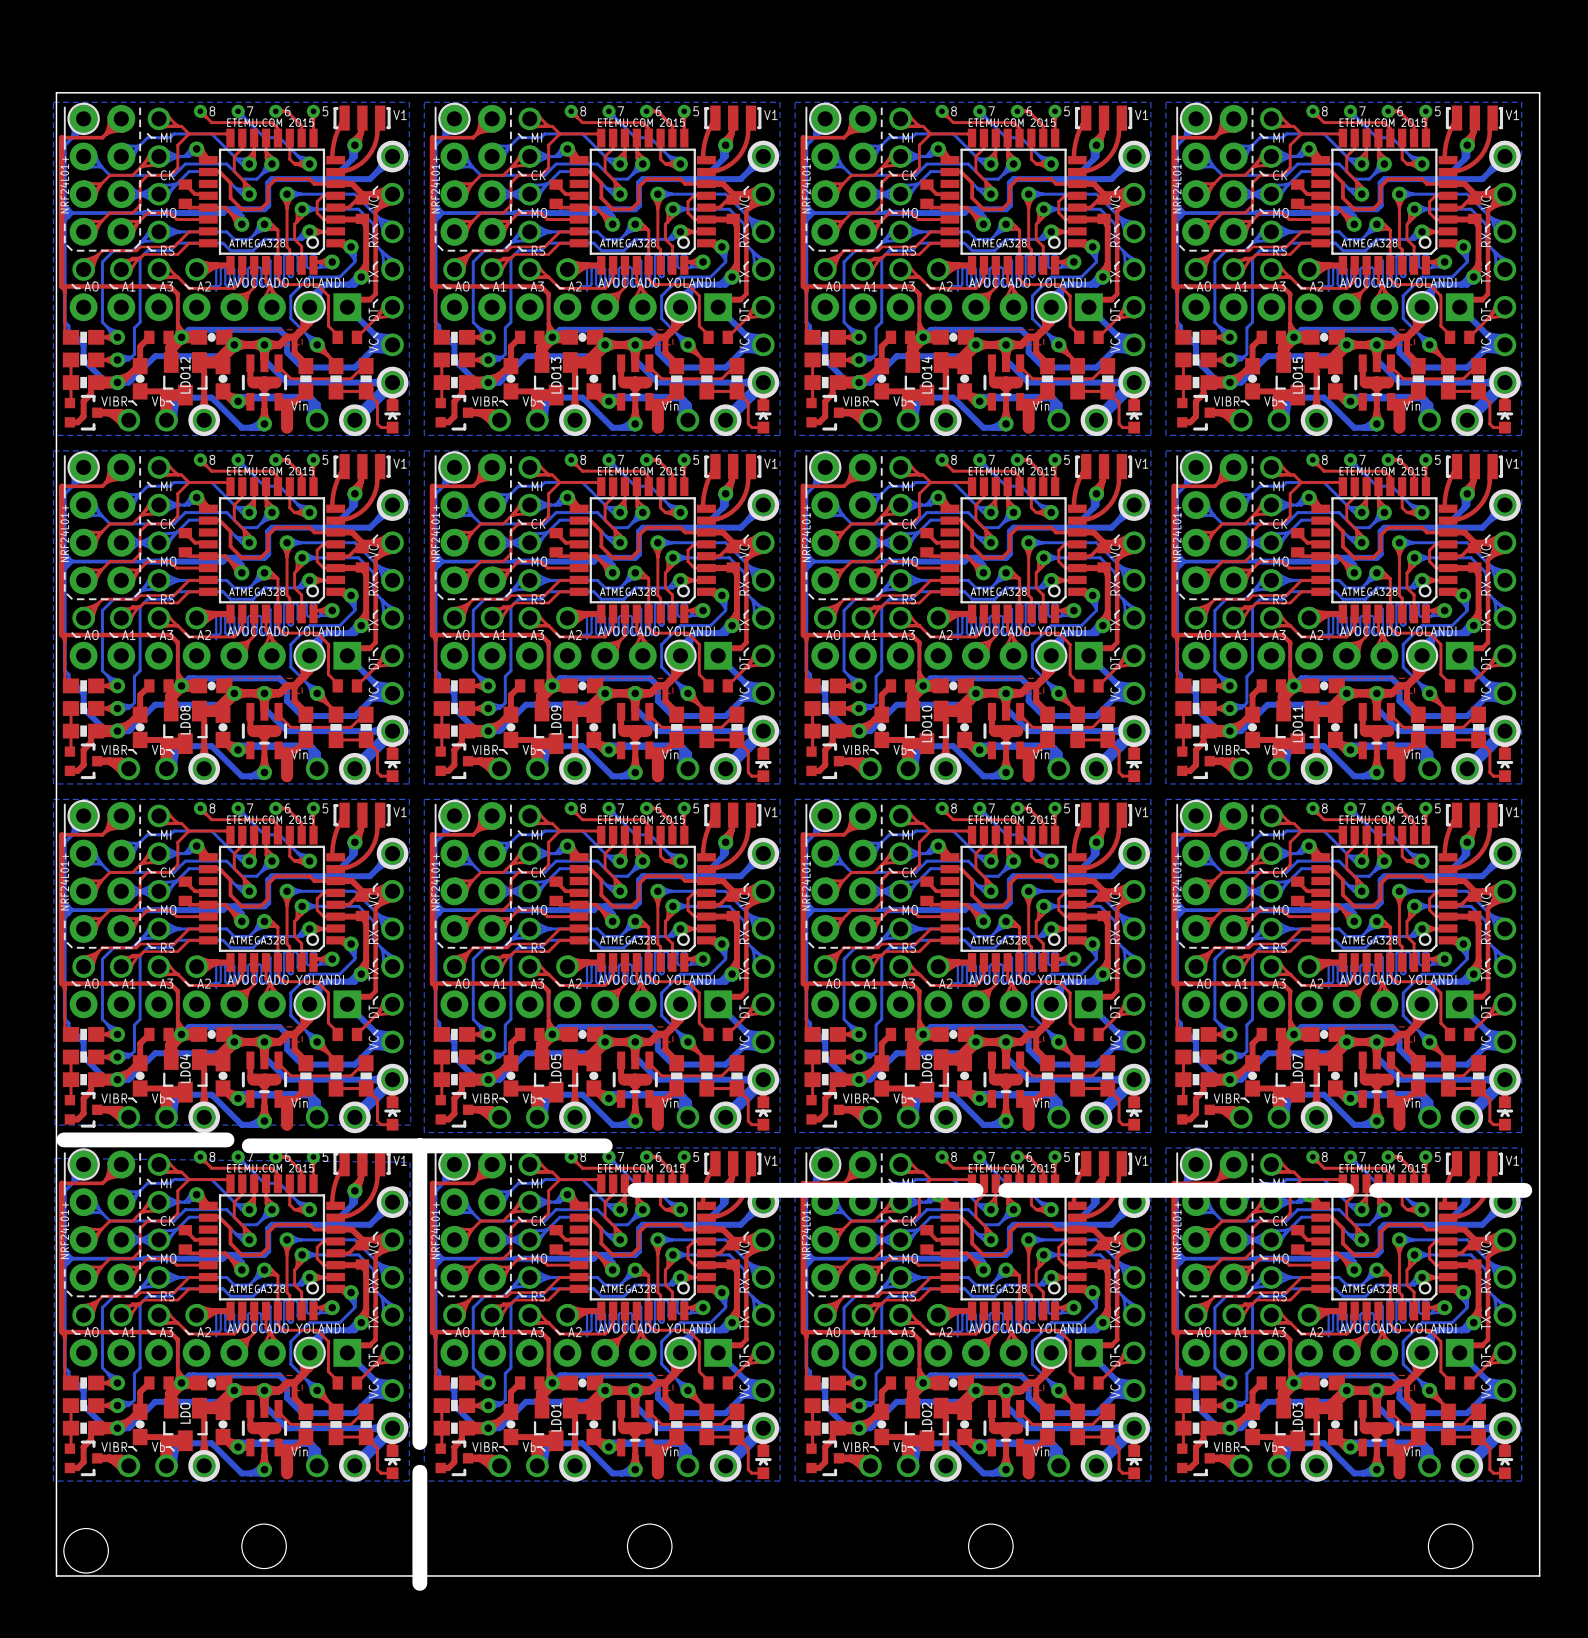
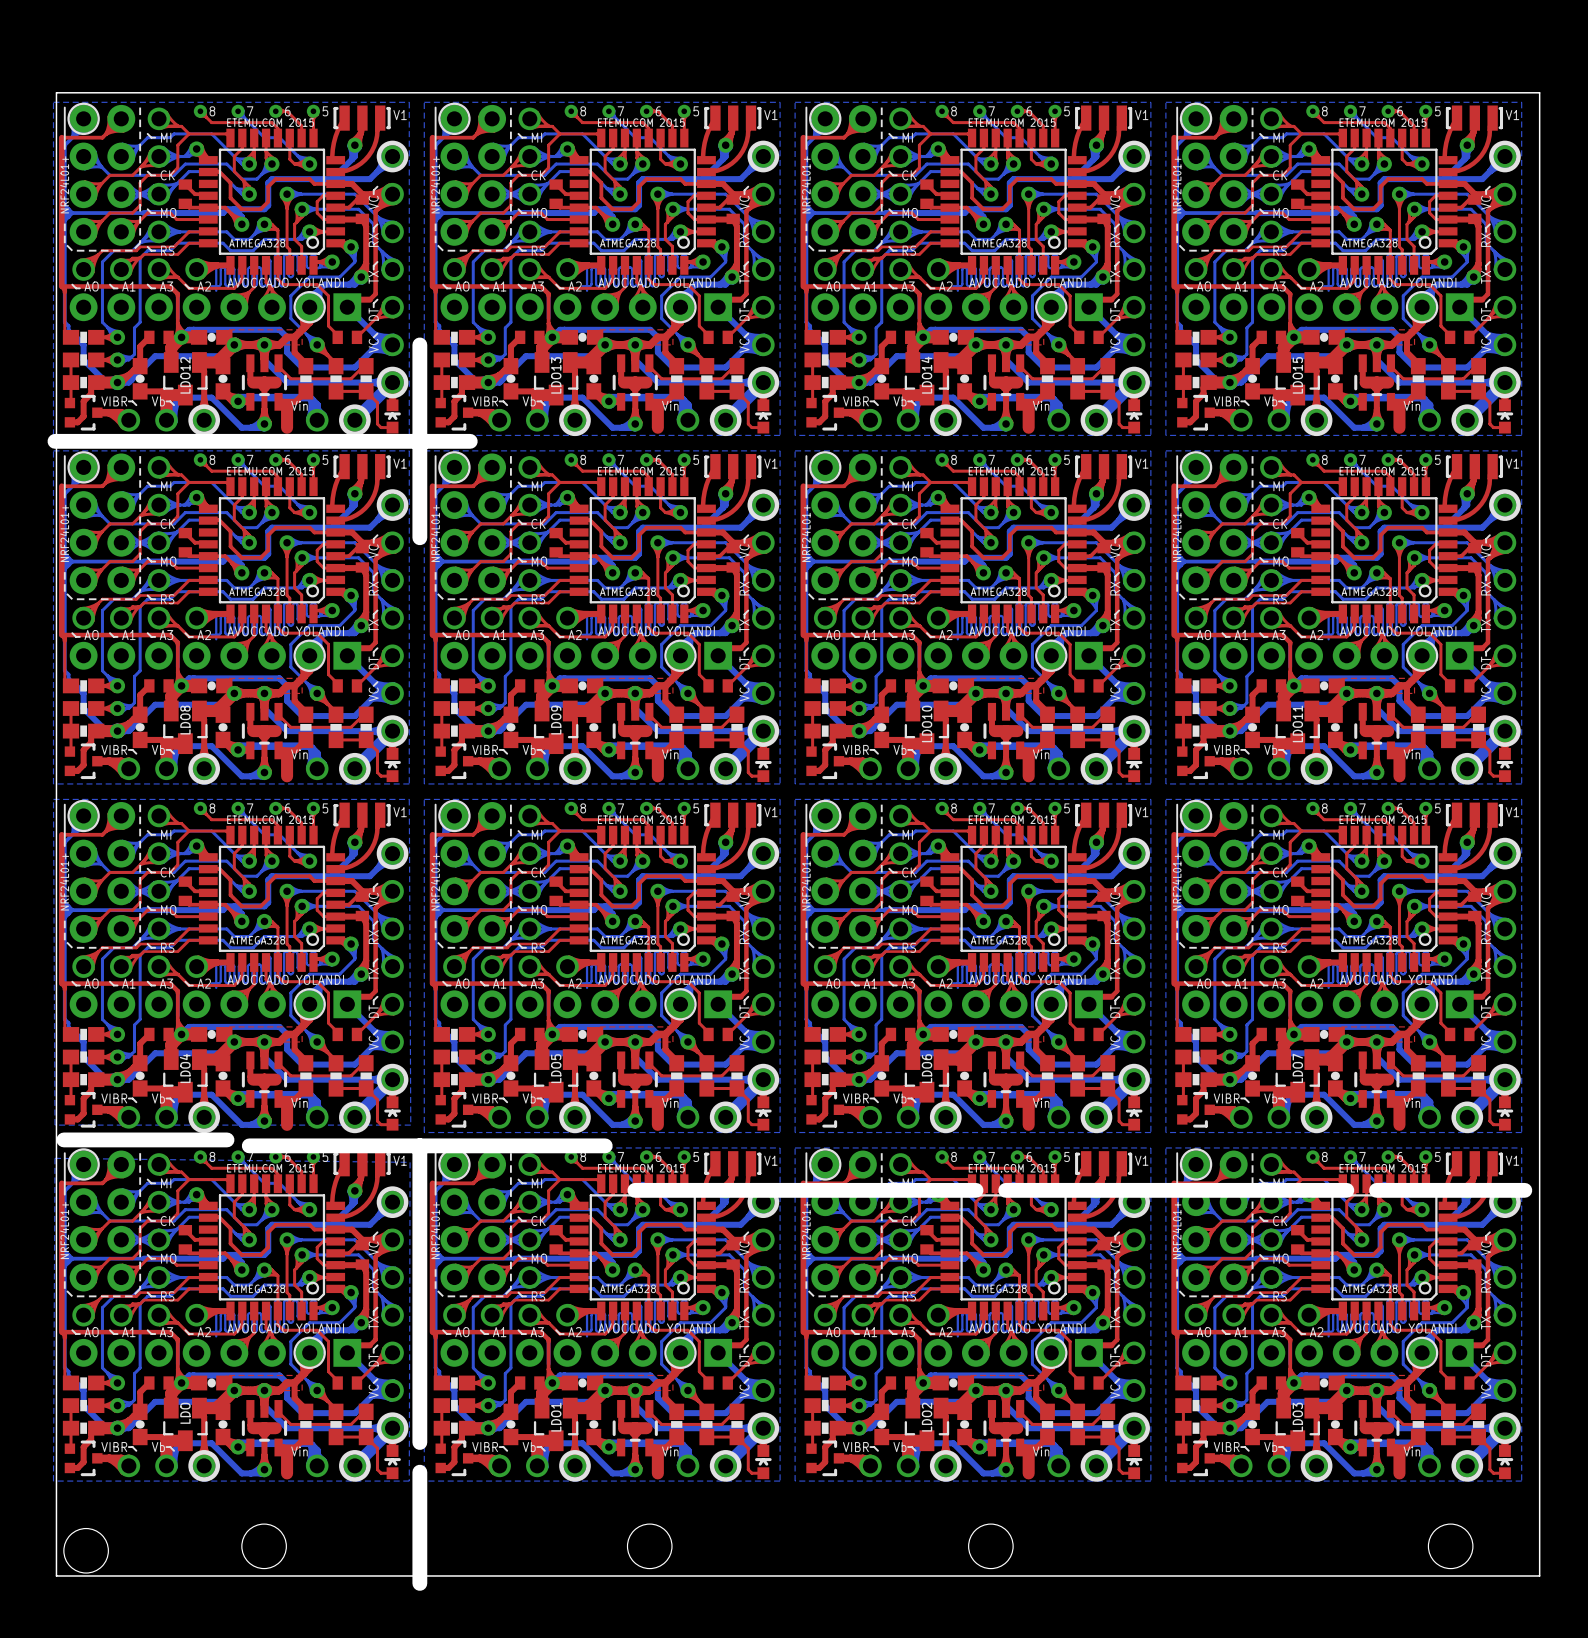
board edge: none -> (419, 344) (419, 537)
board edge: none -> (54, 441) (470, 441)

